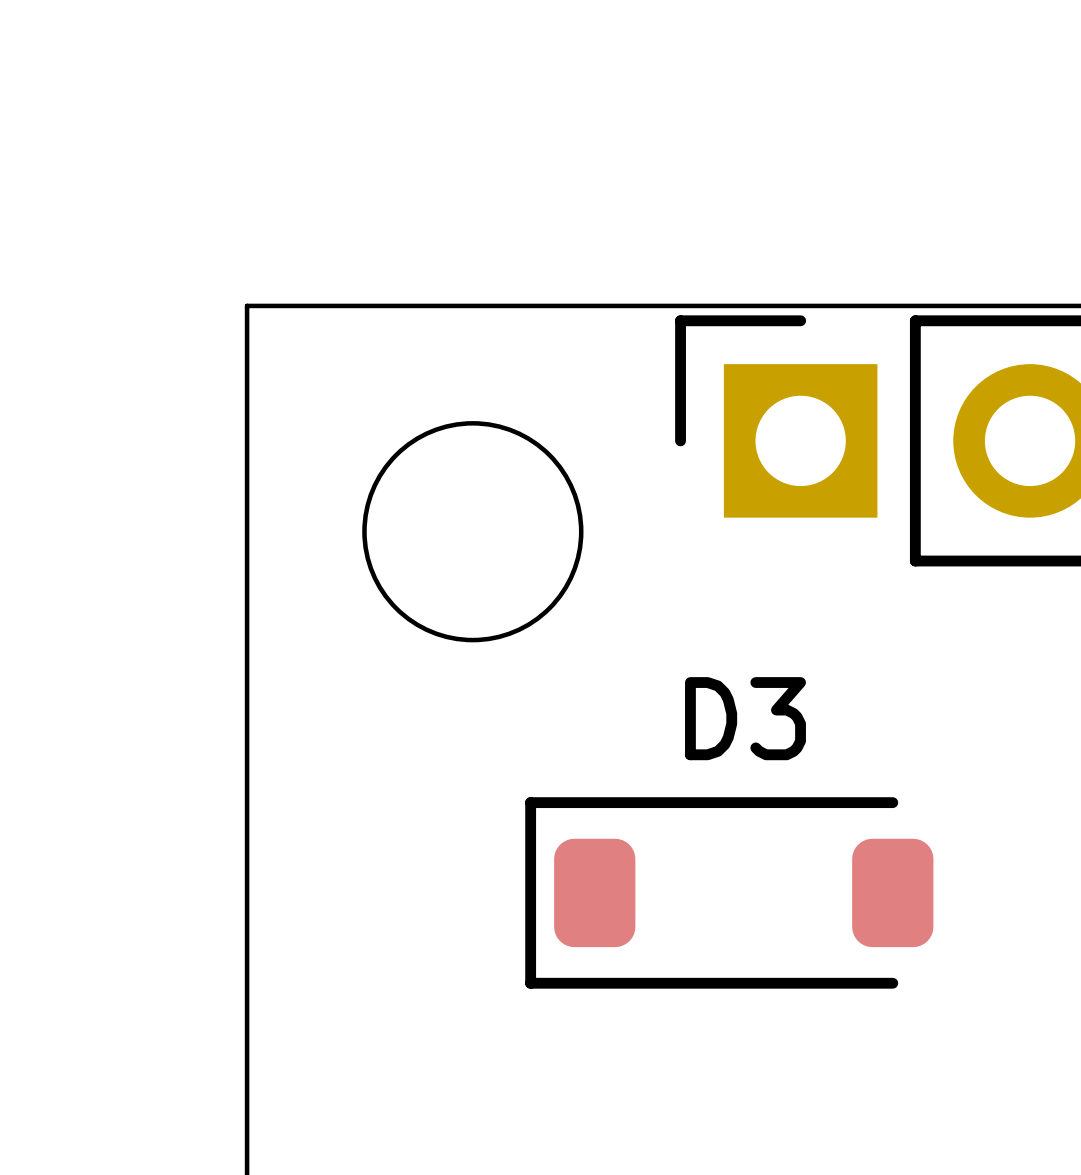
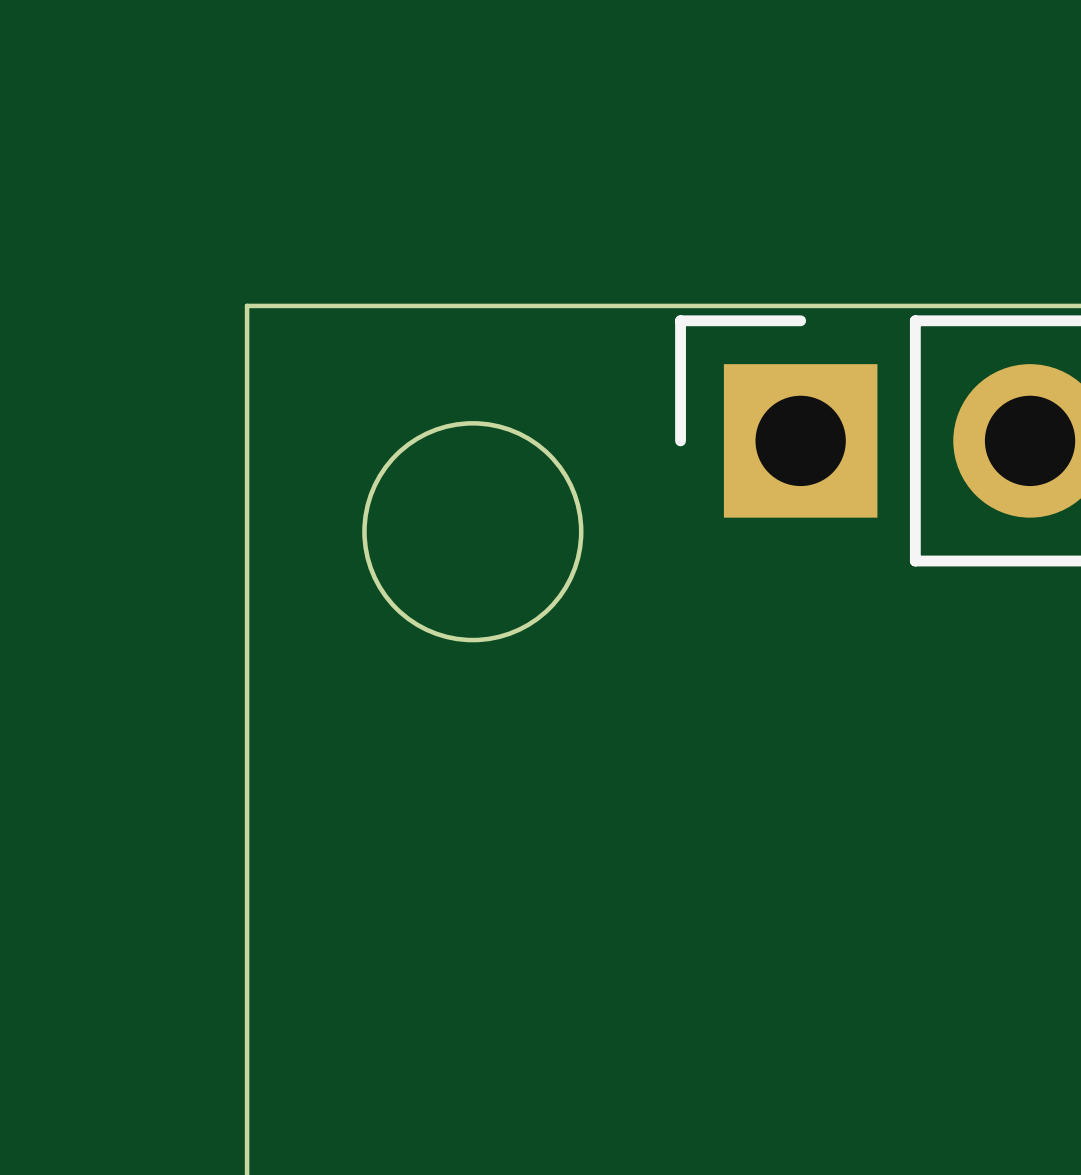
D3: (729, 892) -> none

